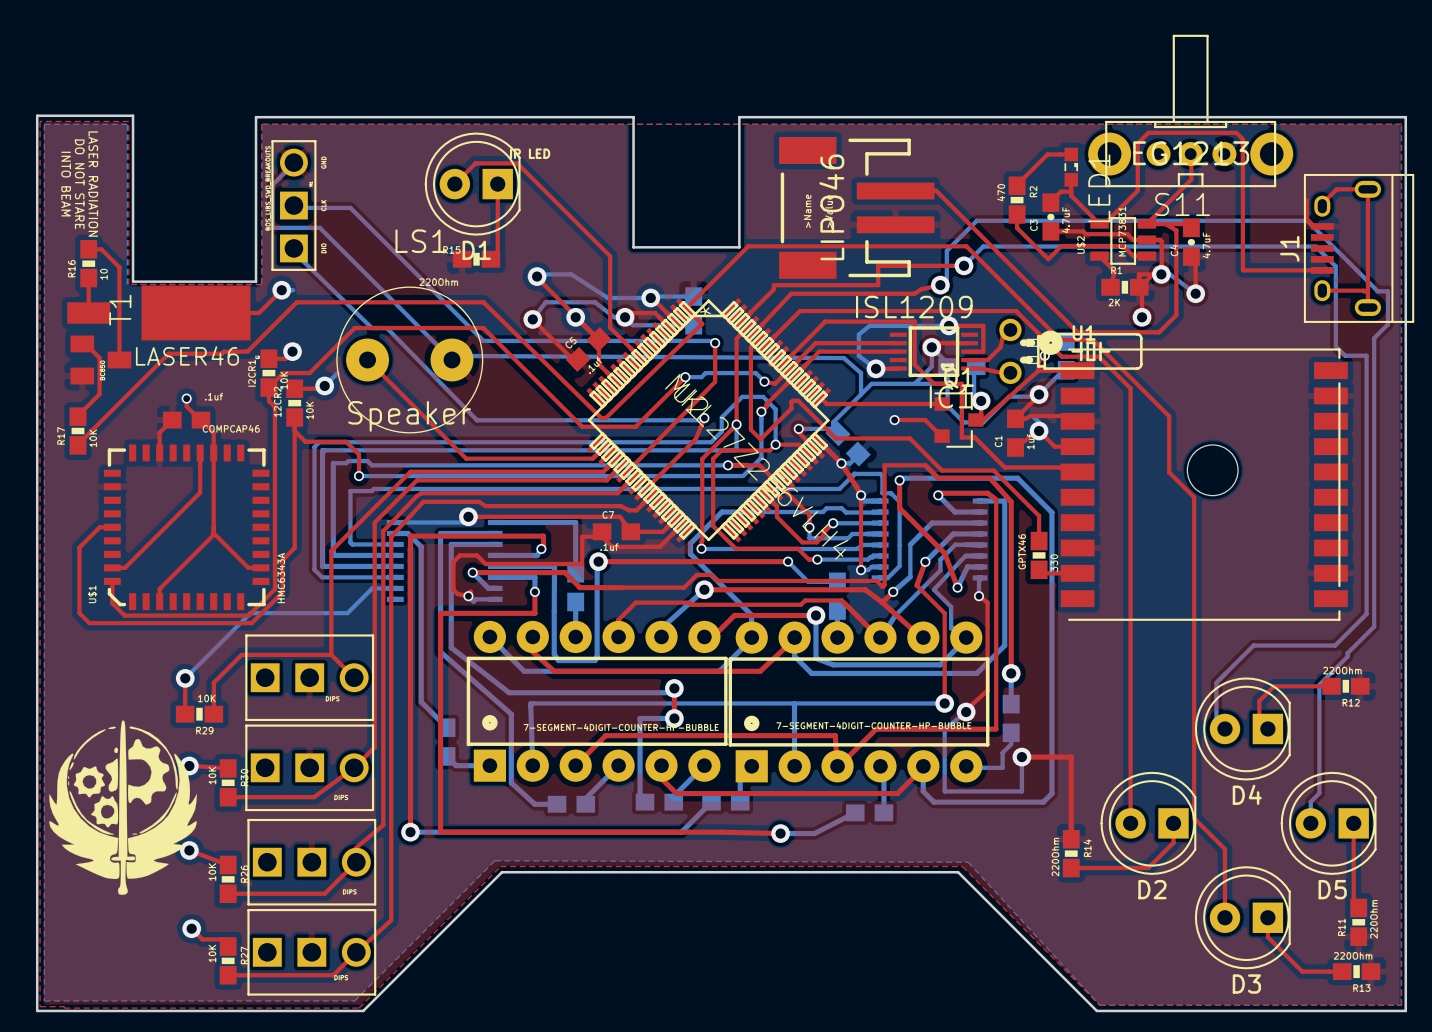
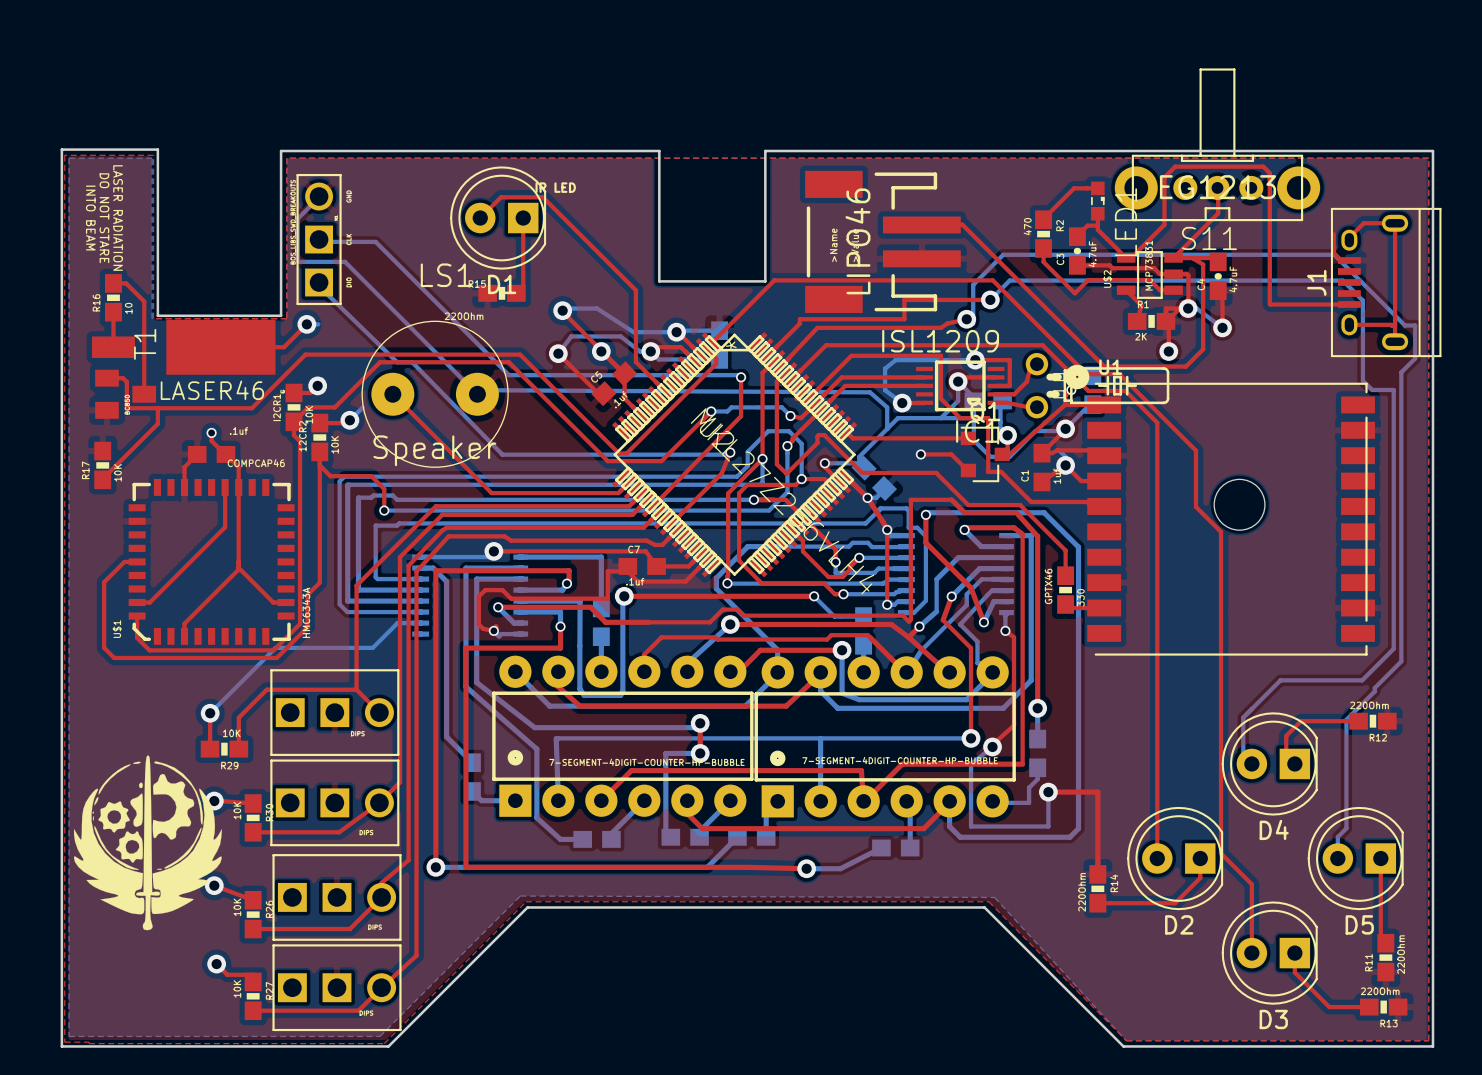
top track: (686, 308) (702, 323) (605, 418) (601, 418) (483, 302) (296, 302) (247, 351) (168, 353) (133, 389) -> (157, 408) (157, 423)
top track: (85, 343) (99, 357) (99, 394) (78, 415) -> (110, 378) (123, 378) (126, 382) (128, 408) (251, 408) (305, 354) (520, 354) (619, 453) (626, 453) (716, 363) (716, 358) (706, 348)

